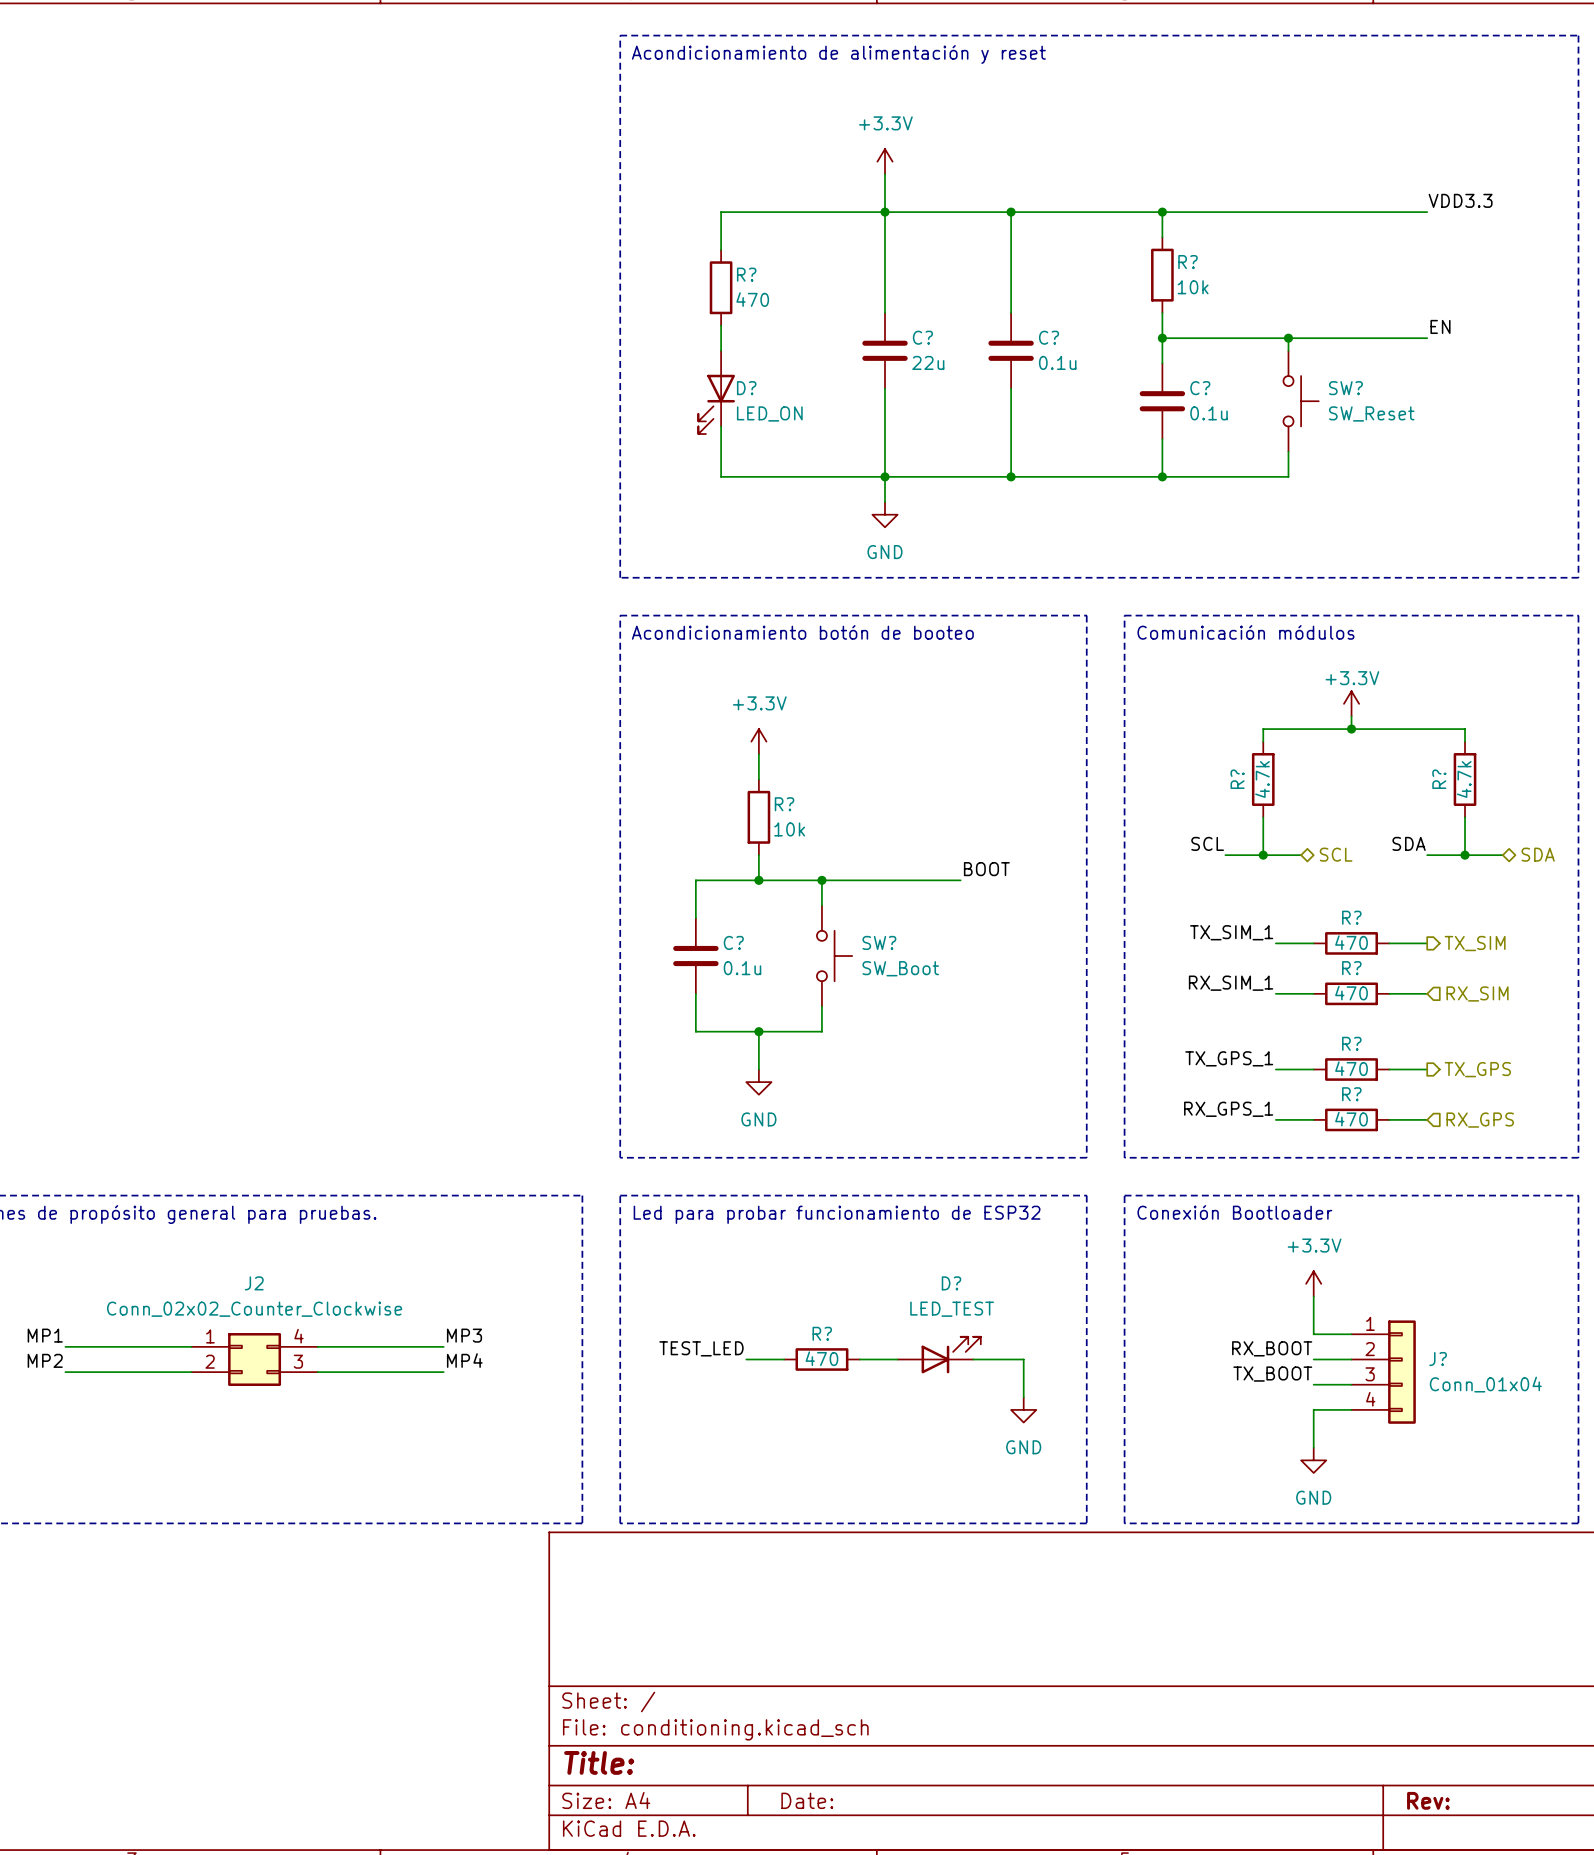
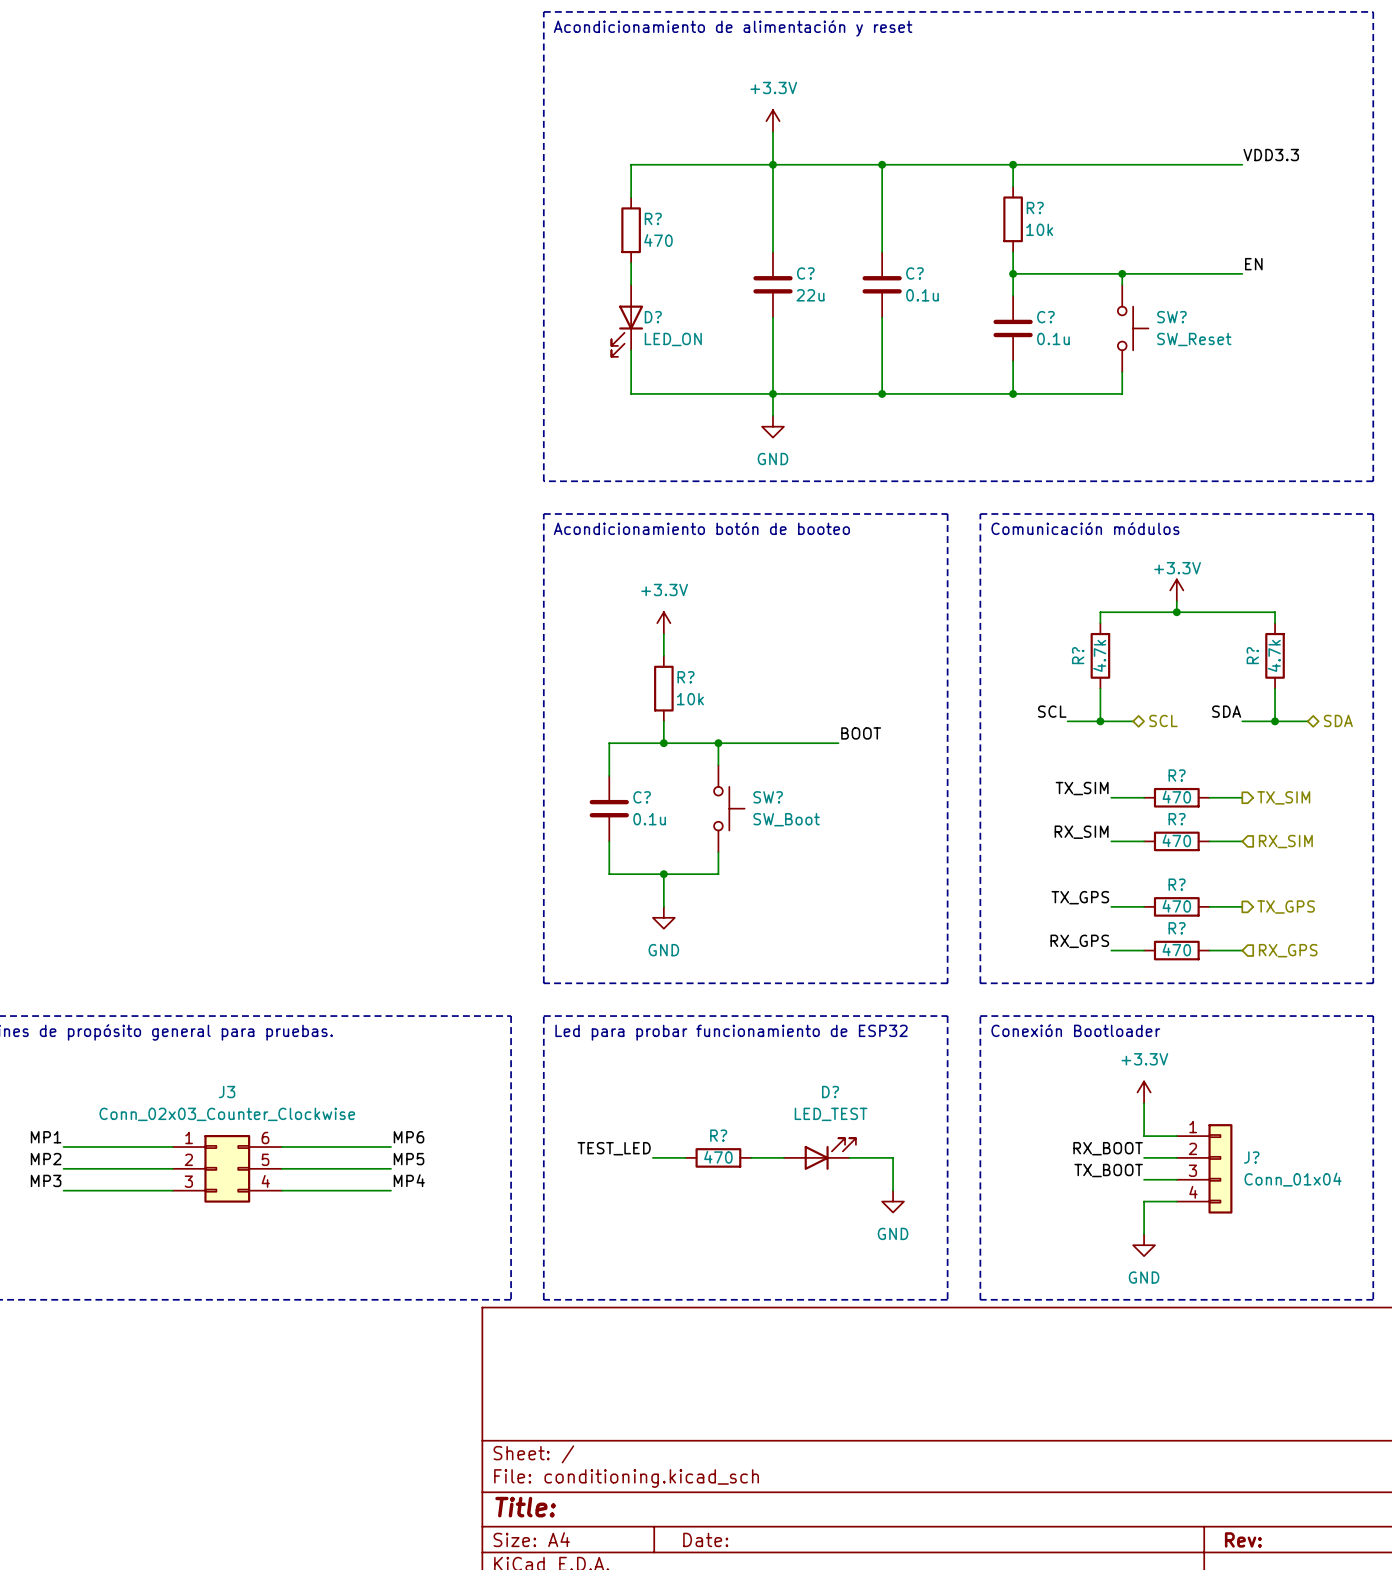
label: TX_SIM_1 (1231, 932) -> TX_SIM (1082, 788)
label: RX_SIM_1 (1231, 983) -> RX_SIM (1081, 832)
label: TX_GPS_1 (1229, 1058) -> TX_GPS (1080, 897)
label: RX_GPS_1 (1228, 1109) -> RX_GPS (1079, 941)
label: MP3 (464, 1335) -> MP6 (409, 1137)
J2: Conn_02x02_Counter_Clockwise (254, 1359) -> none
label: MP4 (464, 1360) -> MP5 (409, 1159)
J3: none -> Conn_02x03_Counter_Clockwise (227, 1168)
label: none -> MP4 (409, 1180)
label: none -> MP3 (46, 1180)
wire: none -> (63, 1190) (172, 1190)
wire: none -> (281, 1190) (391, 1190)

